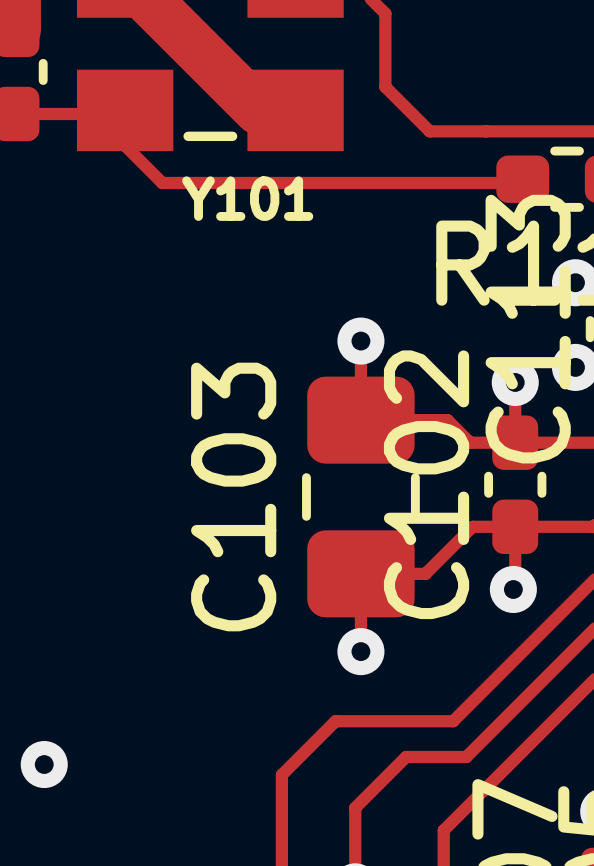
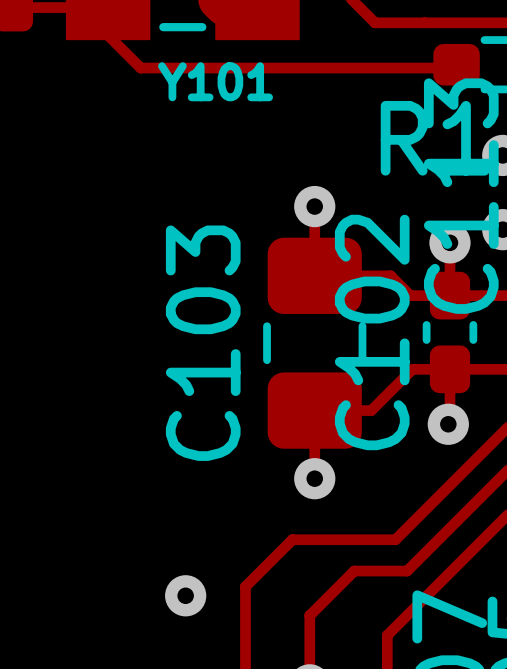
via: (44, 764) -> none
via: none -> (185, 595)

